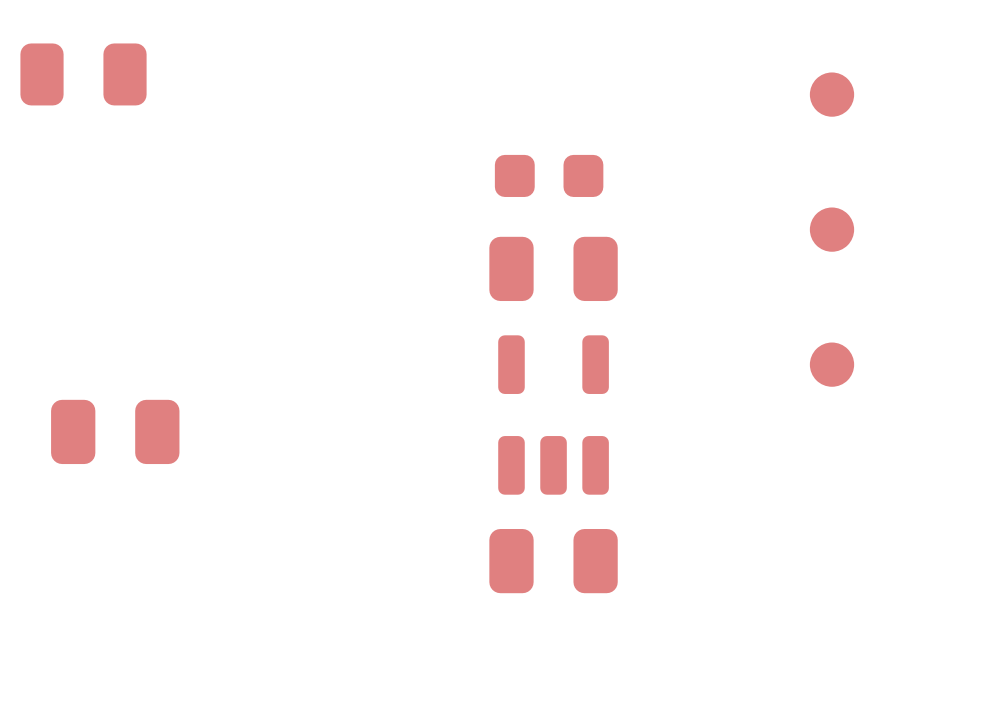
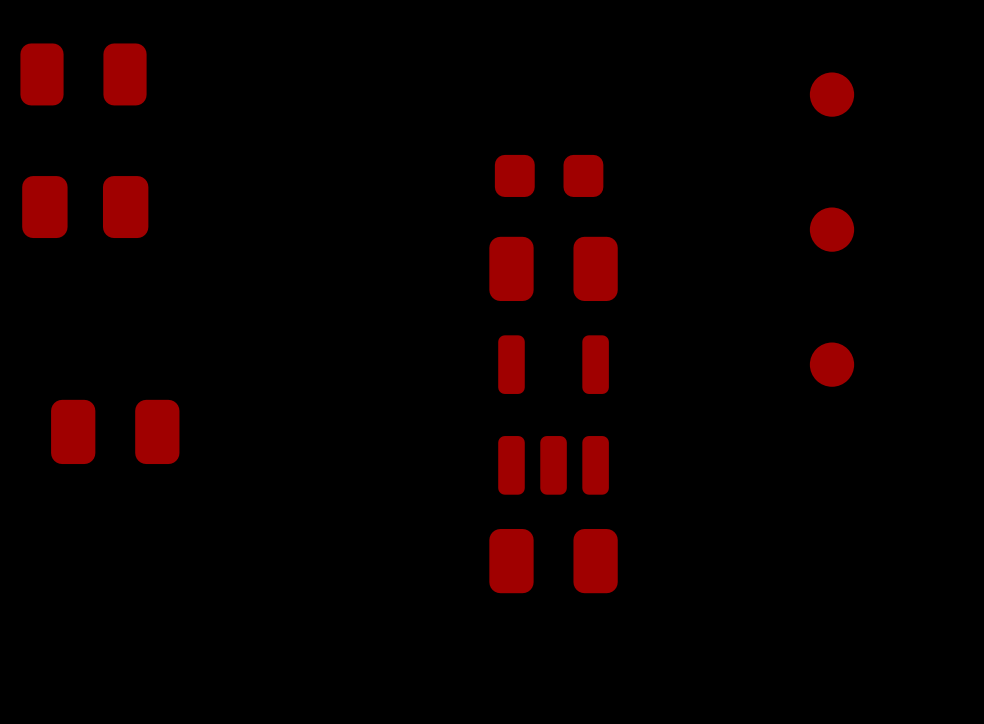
part: none -> (85, 207)

